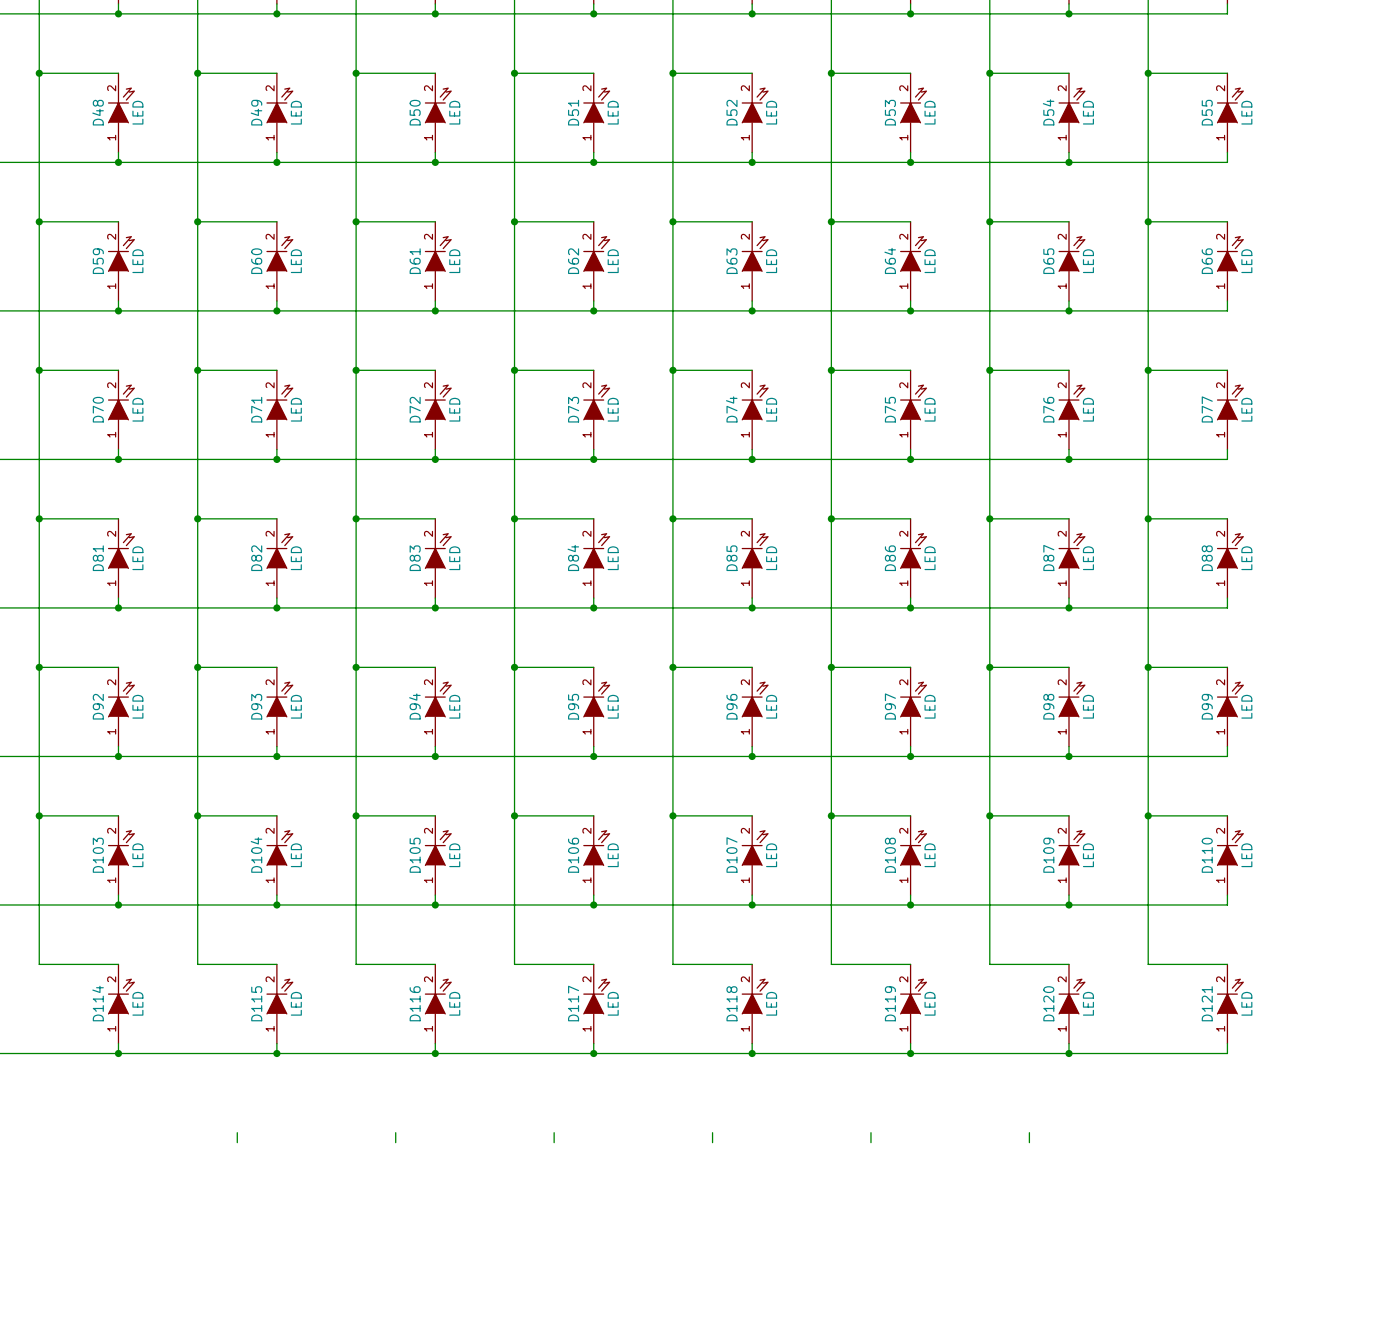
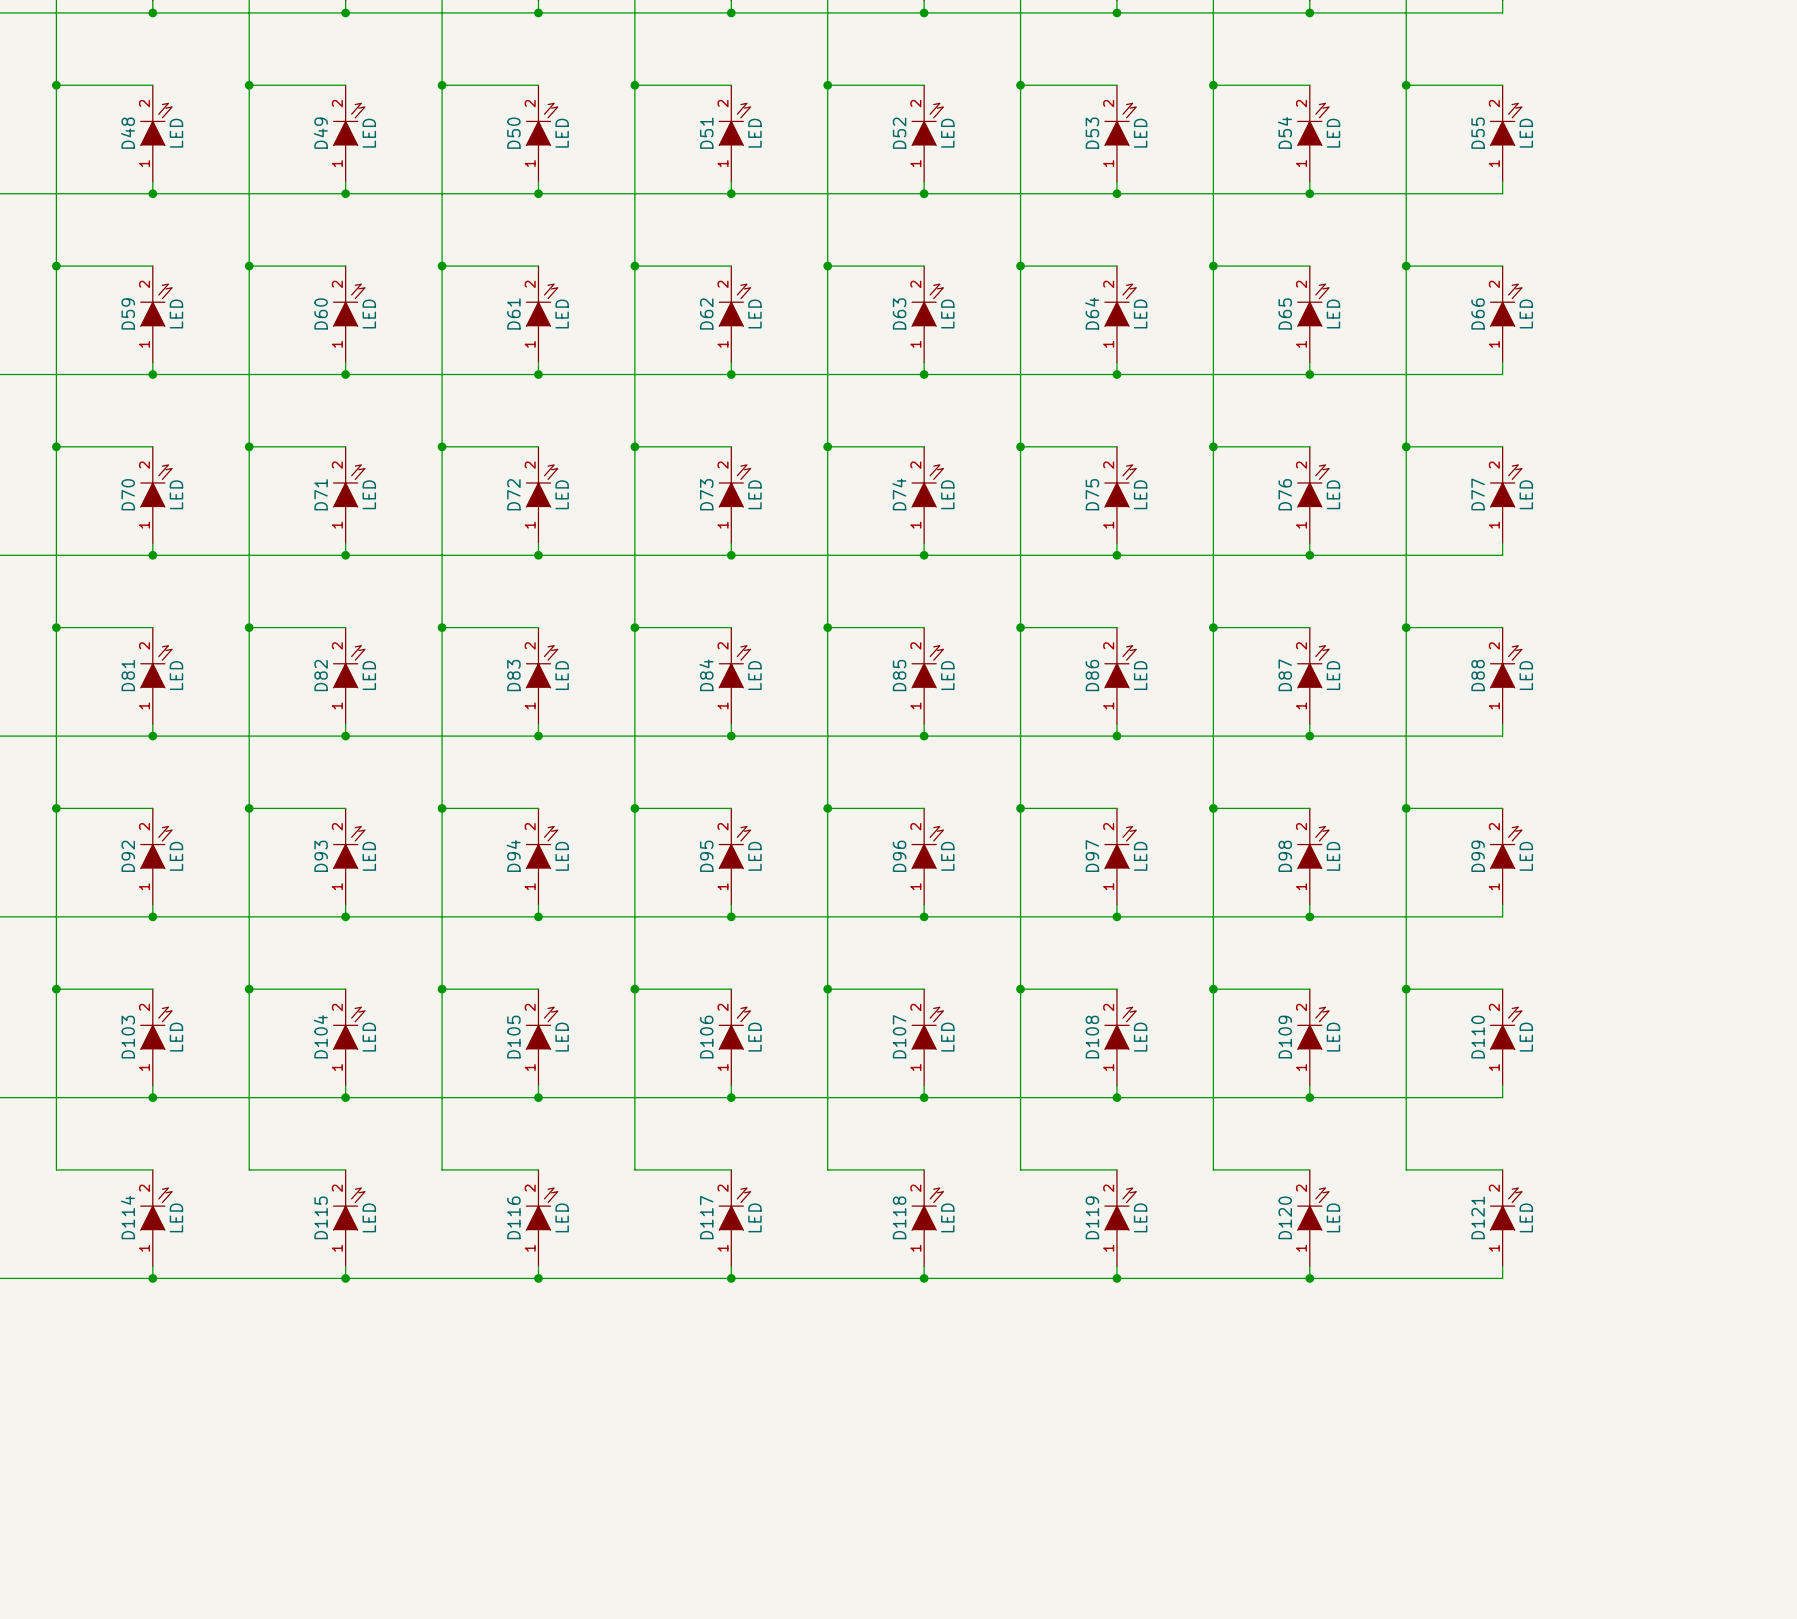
wire: (237, 1132) (237, 1142) -> none
wire: (395, 1132) (395, 1142) -> none
wire: (554, 1132) (554, 1142) -> none
wire: (712, 1132) (712, 1142) -> none
wire: (870, 1132) (870, 1142) -> none
wire: (1029, 1132) (1029, 1142) -> none

